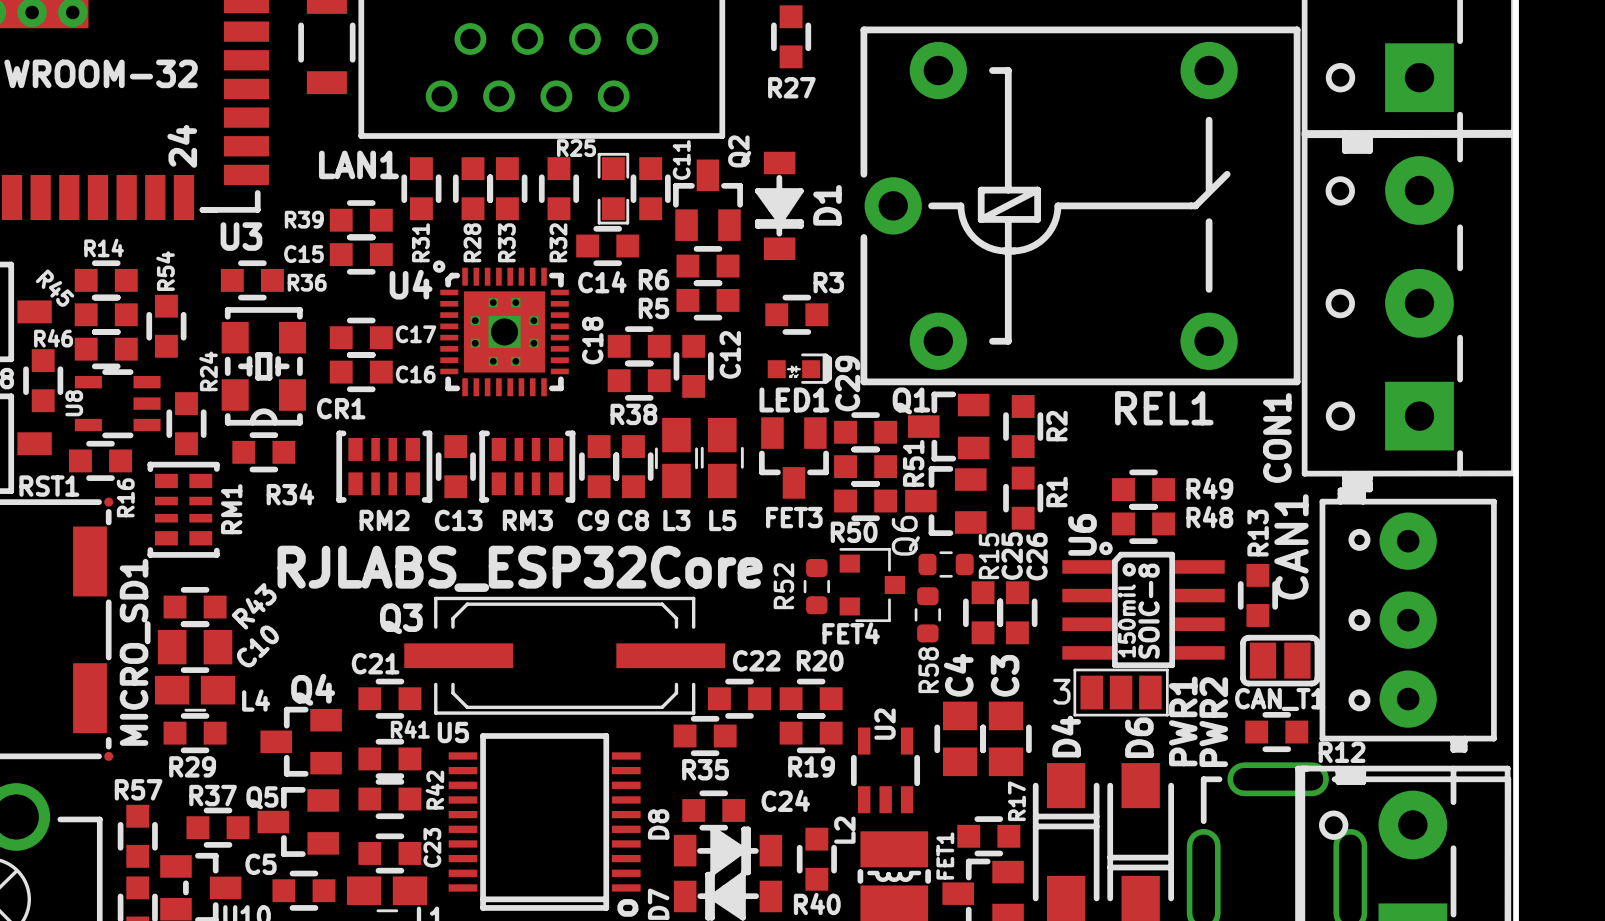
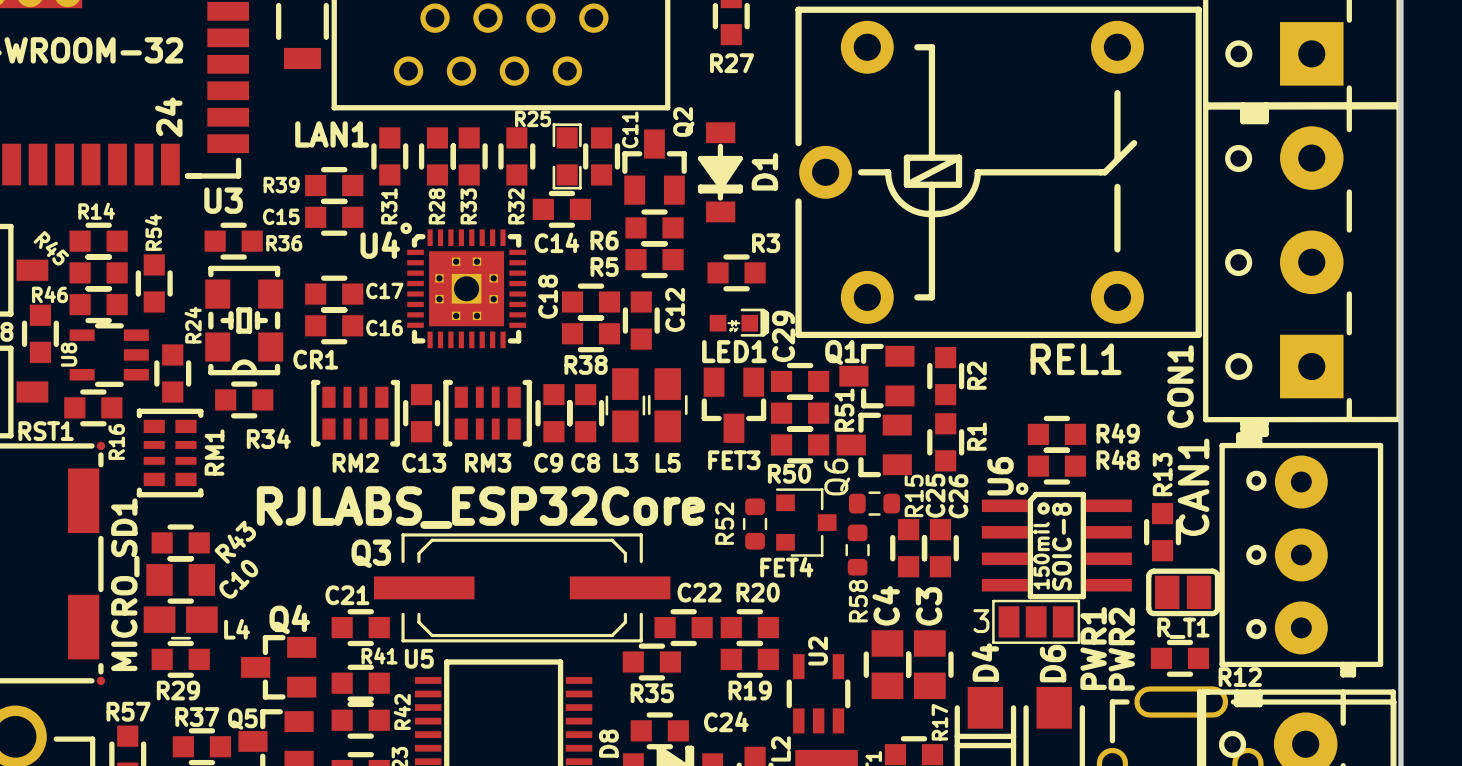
CAN_T1 name: CAN_T1 (1280, 699) -> R_T1 (1183, 628)

